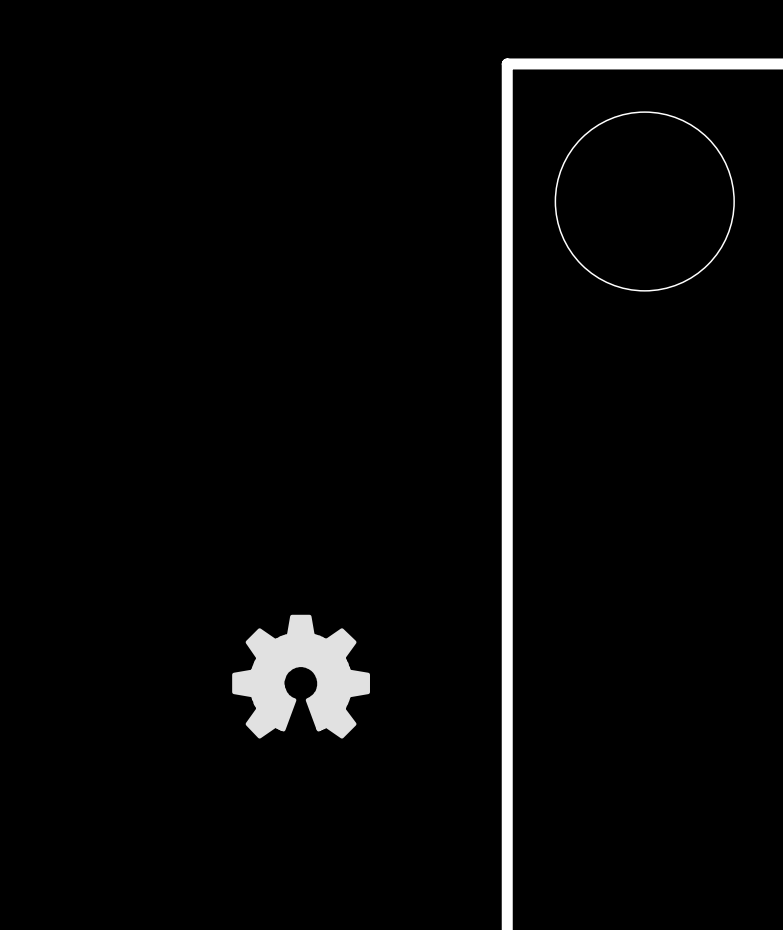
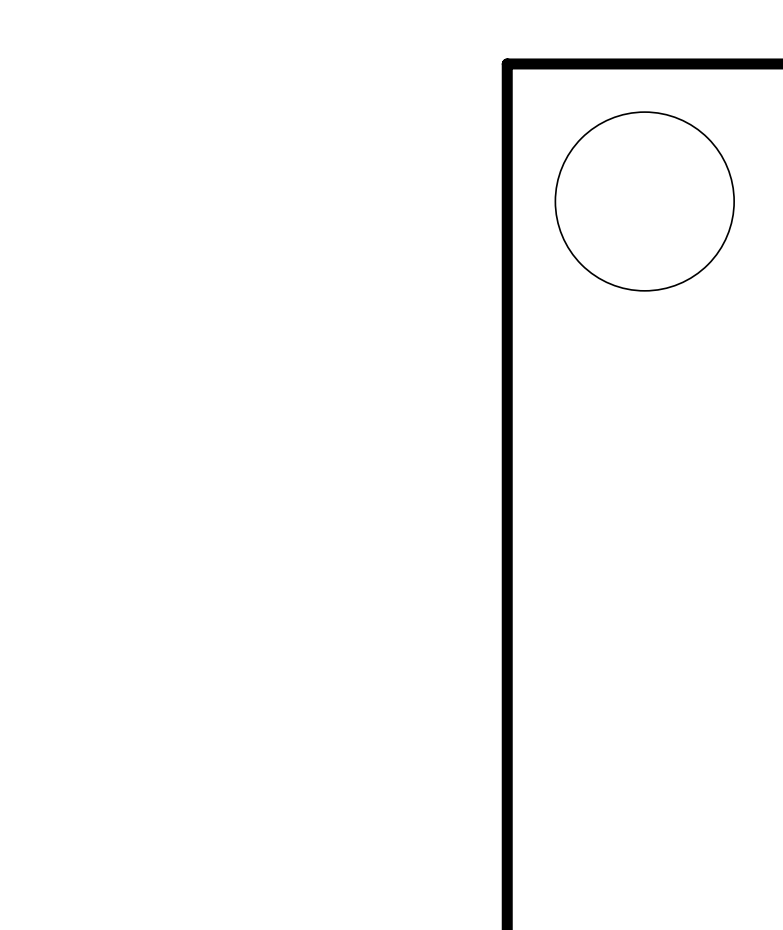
drawing: [232, 614, 370, 739] -> none

